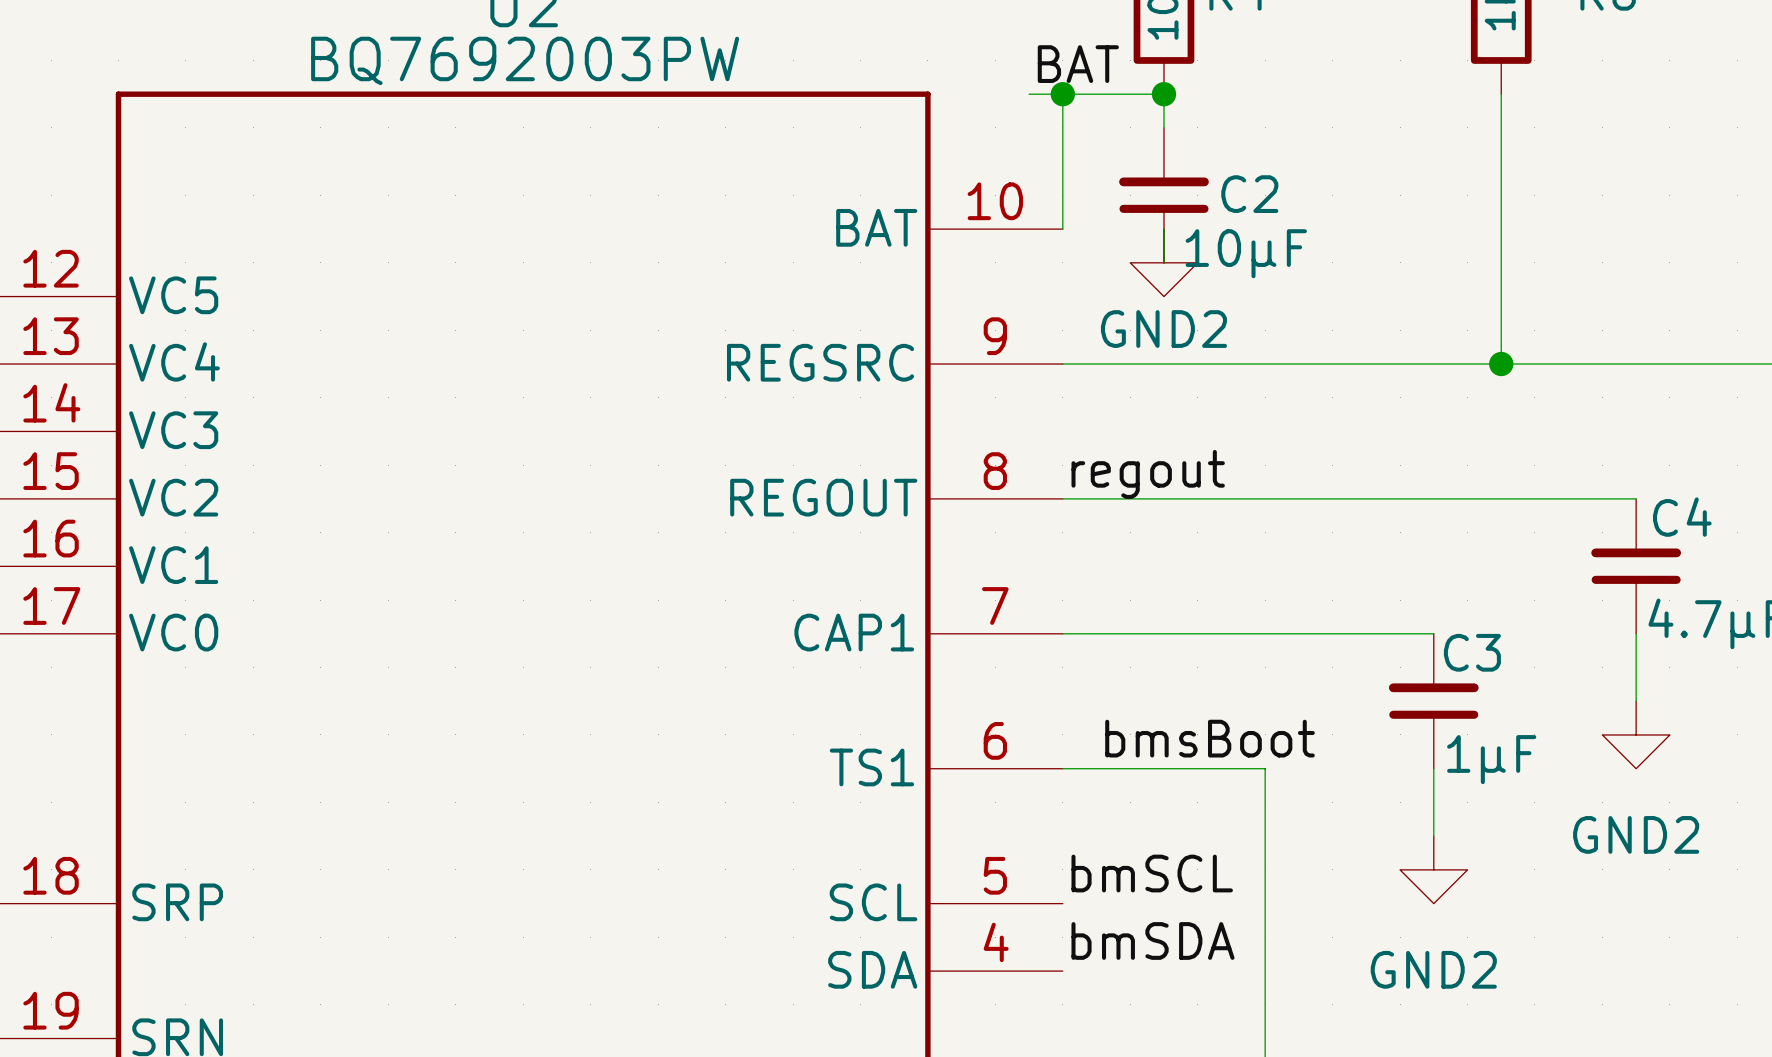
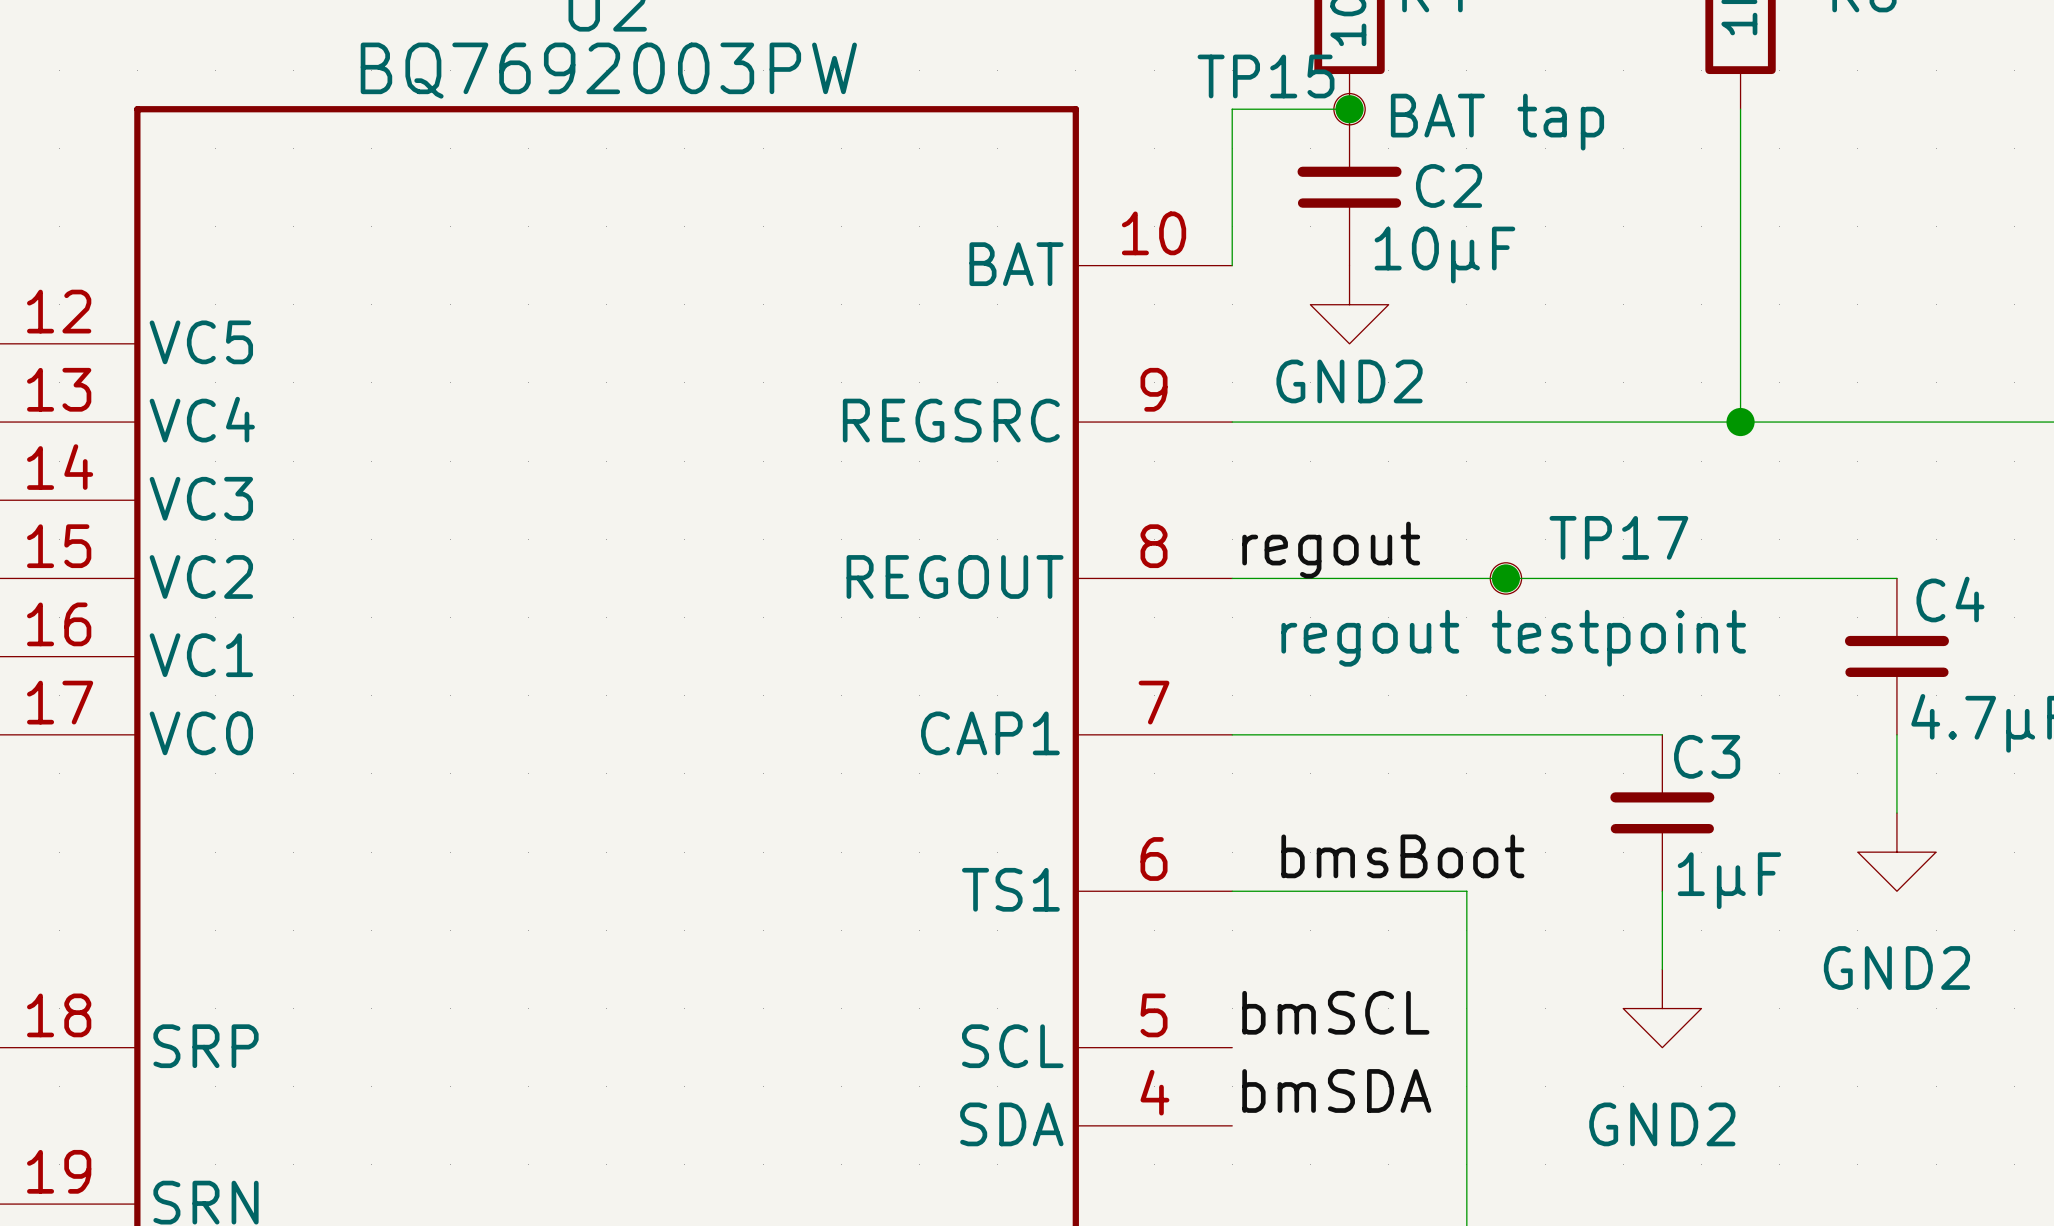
label: BAT (1078, 64) -> none
wire: (1029, 94) (1062, 94) -> none
junction: (1062, 94) -> none
TP15: none -> BAT tap (1349, 109)
C2 position: (1163, 195) -> (1349, 187)
junction: none -> (1505, 578)
TP17: none -> regout testpoint (1505, 578)

